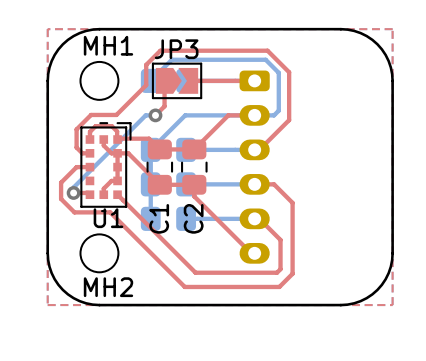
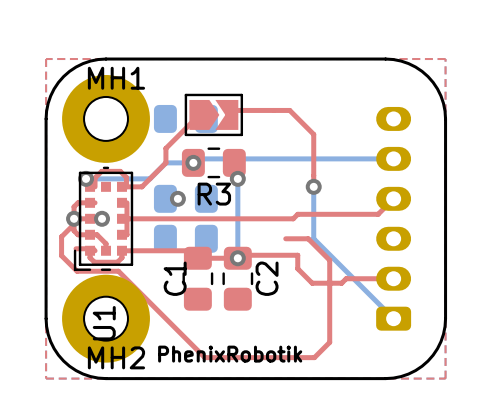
JP3 name: JP3 (176, 49) -> none
top track: none -> (228, 114) (232, 110) (289, 110) (313, 134) (313, 186)
part: none -> (106, 118)
bottom track: (150, 80) (171, 59) (265, 59) (278, 72) (278, 110) (274, 115) -> (393, 158) (308, 158)
top track: (164, 80) (164, 106) (155, 115) -> none
JP3 position: (177, 80) -> (213, 114)
top track: (189, 80) (254, 80) -> none
bottom track: (155, 115) (145, 115) (73, 187) (73, 192) -> none
via: (155, 115) -> none
bottom track: (185, 115) (150, 149) (150, 218) -> (205, 158) (197, 158) (193, 162) (165, 162) (149, 178) (86, 178)
top track: (254, 115) (228, 115) (194, 149) (159, 149) (149, 138) (117, 139) -> (199, 114) (165, 148) (165, 162) (141, 186) (126, 186)
via: none -> (193, 162)
via: none -> (86, 178)
bottom track: none -> (237, 178) (237, 258)
via: none -> (237, 178)
top track: (103, 139) (103, 145) (111, 153) (128, 153) (159, 184) (194, 184) (194, 196) (251, 253) (254, 253) -> none
bottom track: none -> (313, 186) (313, 238) (393, 318)
via: none -> (313, 186)
via: none -> (177, 198)
bottom track: (186, 149) (254, 149) -> none
top track: (254, 149) (259, 149) (289, 120) (289, 72) (267, 50) (160, 50) (146, 64) (146, 85) (116, 114) (91, 114) (76, 129) (76, 147) (82, 153) -> (106, 250) (106, 243) (97, 234) (78, 234) (74, 230) (74, 206) (78, 202) (86, 202)
top track: none -> (393, 198) (378, 214) (297, 214) (293, 218) (121, 218)
via: none -> (74, 218)
via: none -> (102, 218)
U1 rotation: 0° (105, 167) -> 180° (103, 218)
C1 position: (159, 167) -> (197, 278)
C2 position: (194, 167) -> (237, 278)
part rotation: 0° (254, 167) -> 180° (393, 218)
top track: (113, 180) (103, 188) (103, 194) -> none
bottom track: (186, 184) (254, 184) -> none
via: (73, 192) -> none
top track: none -> (90, 250) (90, 257) (94, 262) (117, 262) (121, 257) (121, 250) (190, 250) (197, 258) (237, 258) (240, 255) (297, 255) (297, 268) (312, 283) (341, 283) (346, 278) (393, 278)
top track: (117, 194) (195, 272) (276, 272) (280, 269) (280, 239) (259, 218) (254, 218) -> none
via: none -> (237, 258)
U1 name position: U1 (108, 218) -> U1 (104, 323)
R3 side: bottom (168, 218) -> top (213, 162)
bottom track: (186, 218) (254, 218) -> none
C2 name position: C2 (193, 218) -> C2 (267, 278)
part: none -> (106, 318)
text: none -> PhenixRobotik (230, 354)

